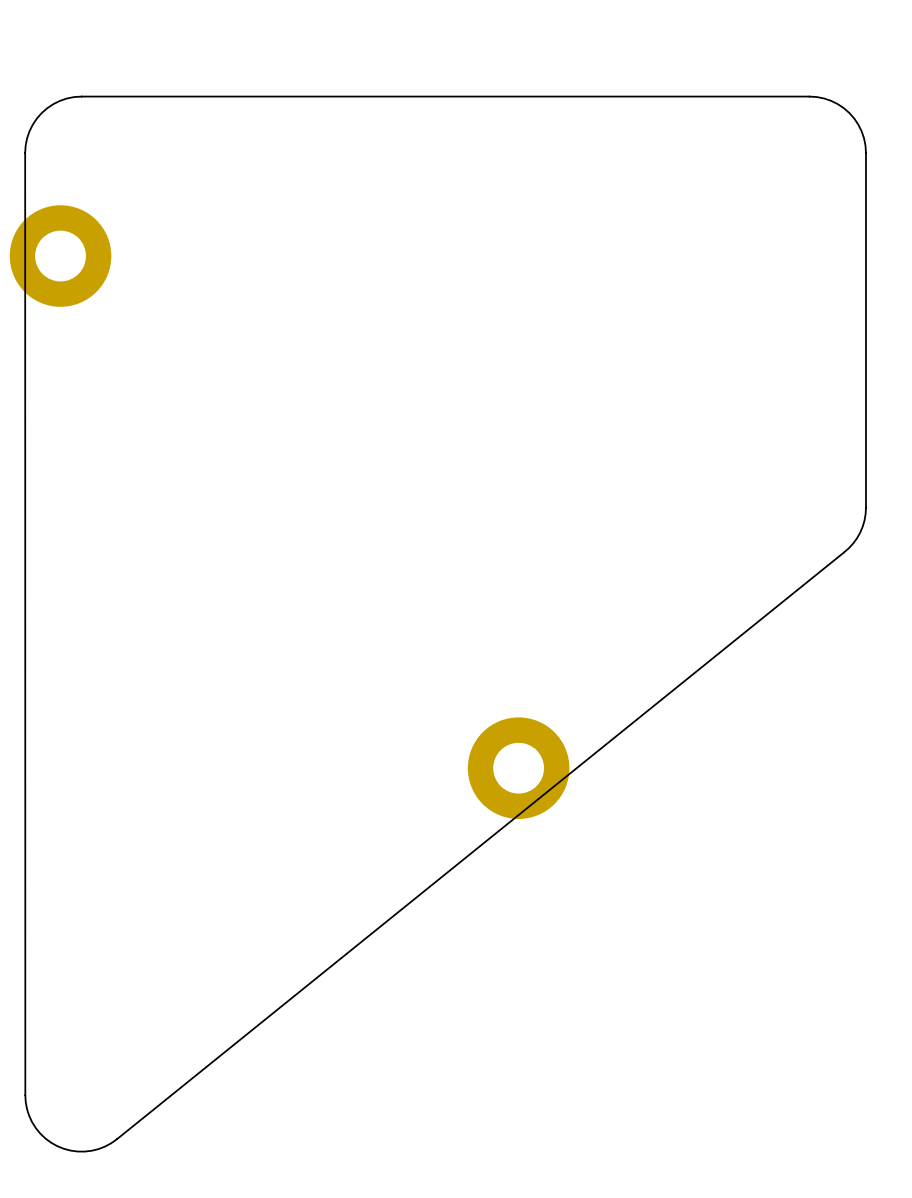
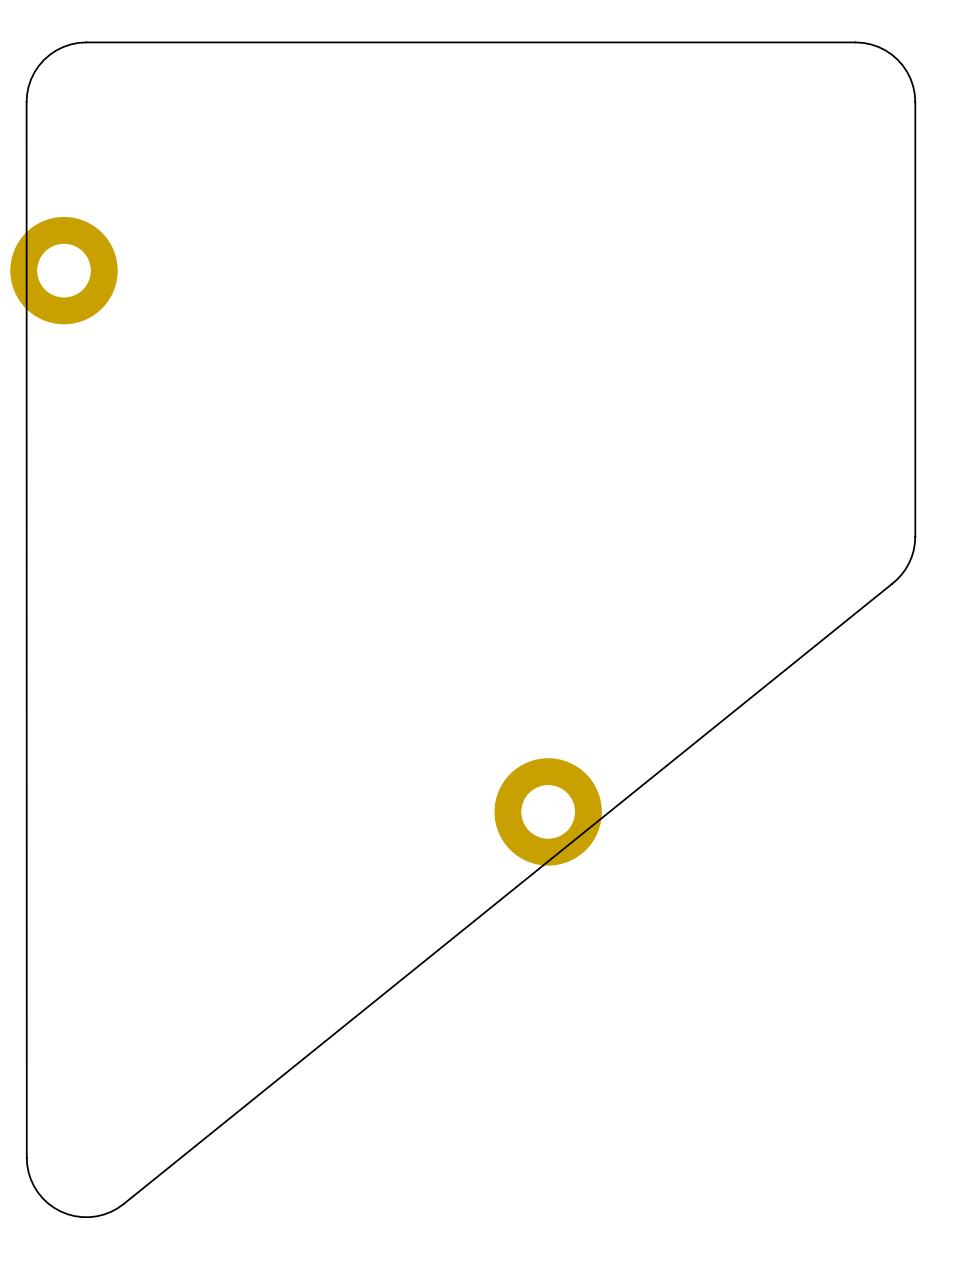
board edge: (865, 152) (861, 131) (849, 113) (831, 100) (809, 96) (74, 97) (53, 104) (41, 113) (29, 131) (25, 152) -> (915, 161) (914, 94) (907, 72) (897, 59) (885, 50) (871, 44) (855, 42) (78, 42) (63, 46) (49, 54) (38, 65) (31, 79) (26, 102) (26, 161)

